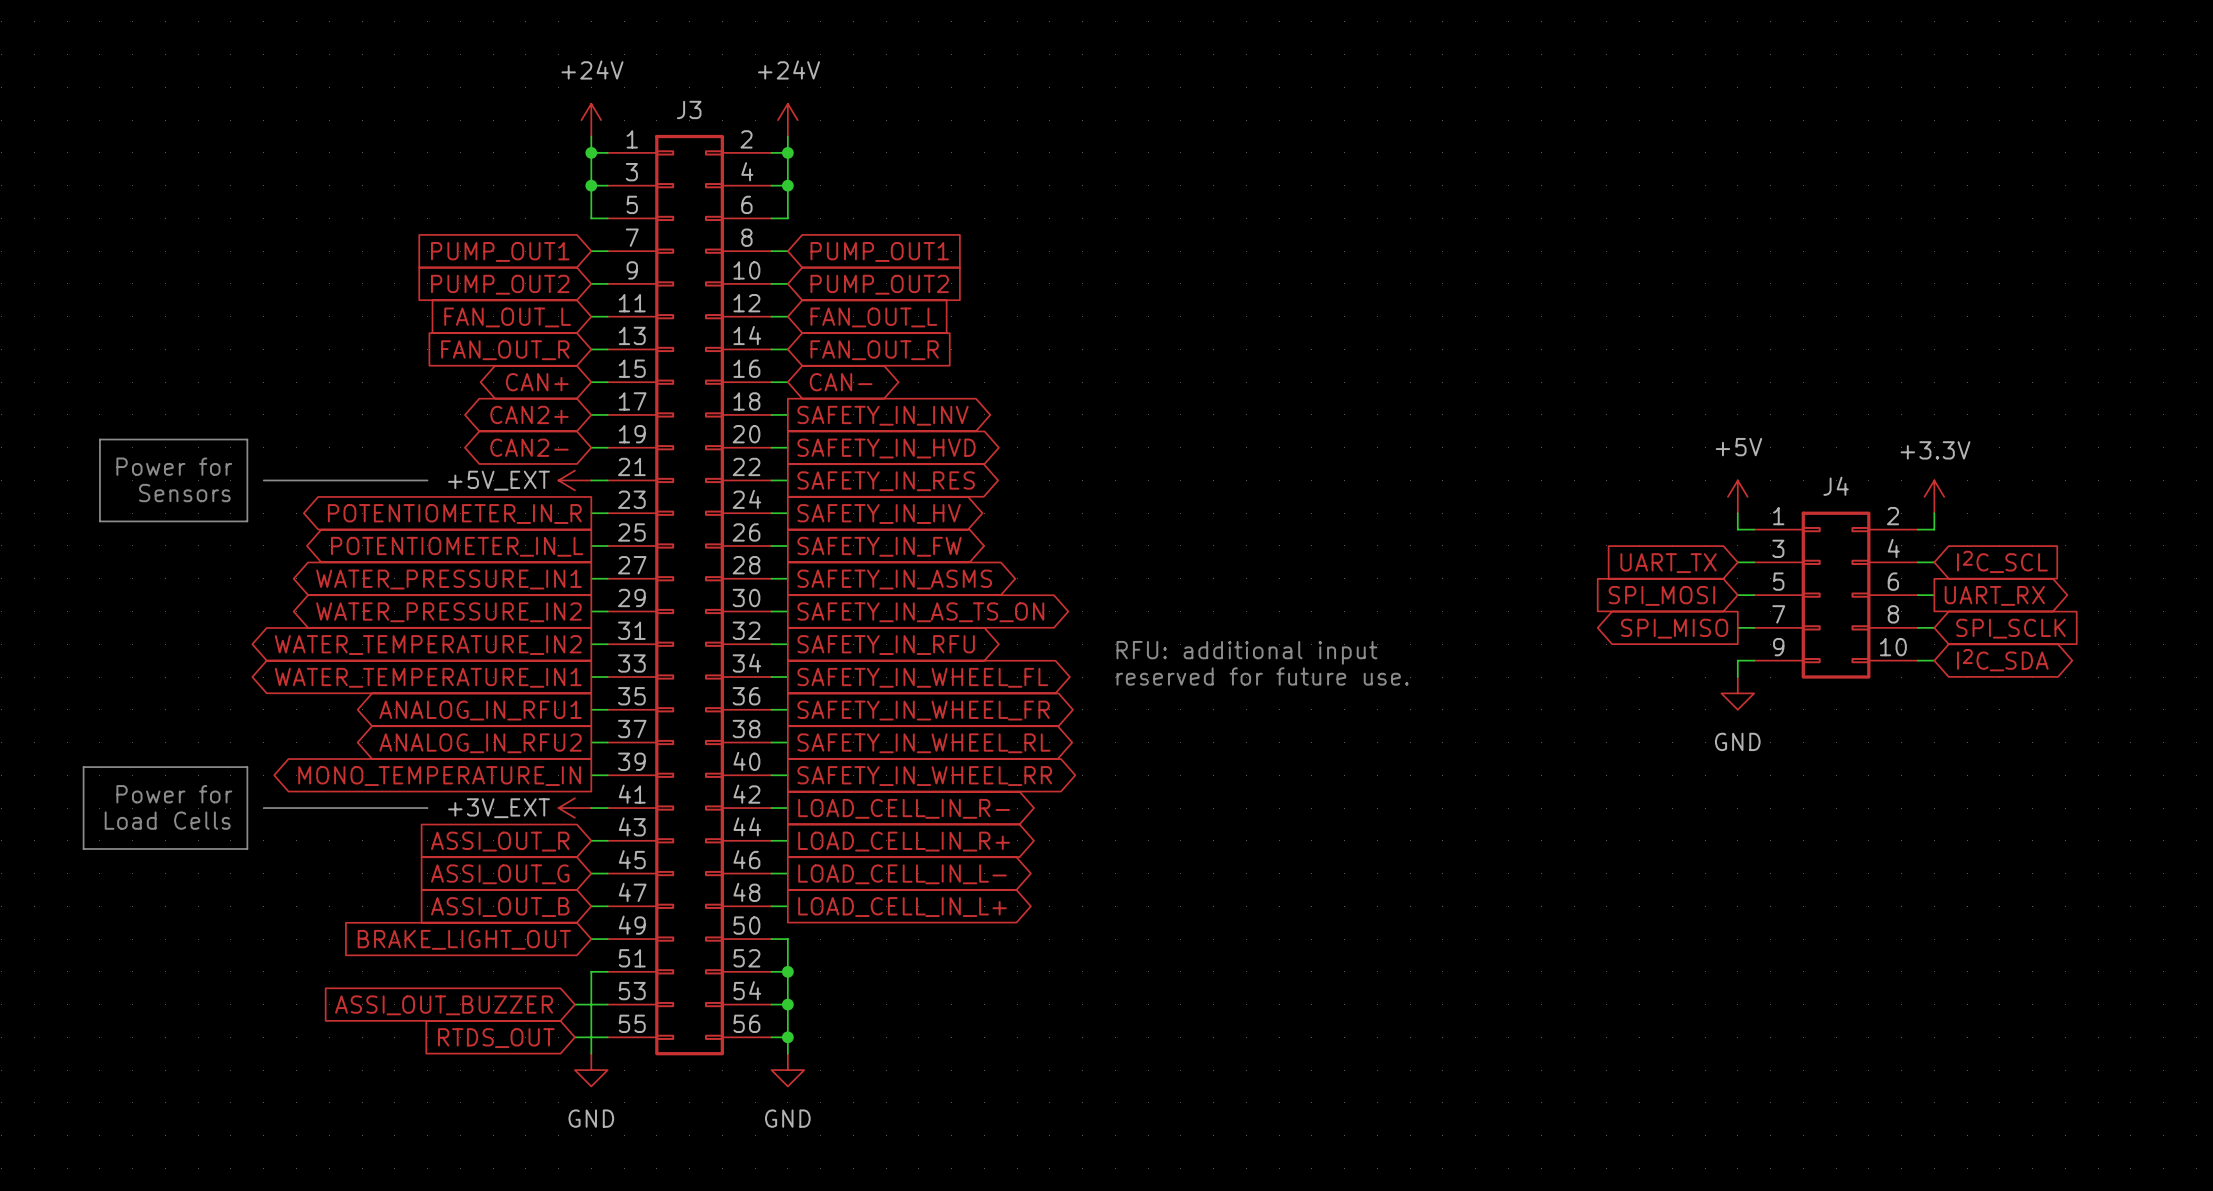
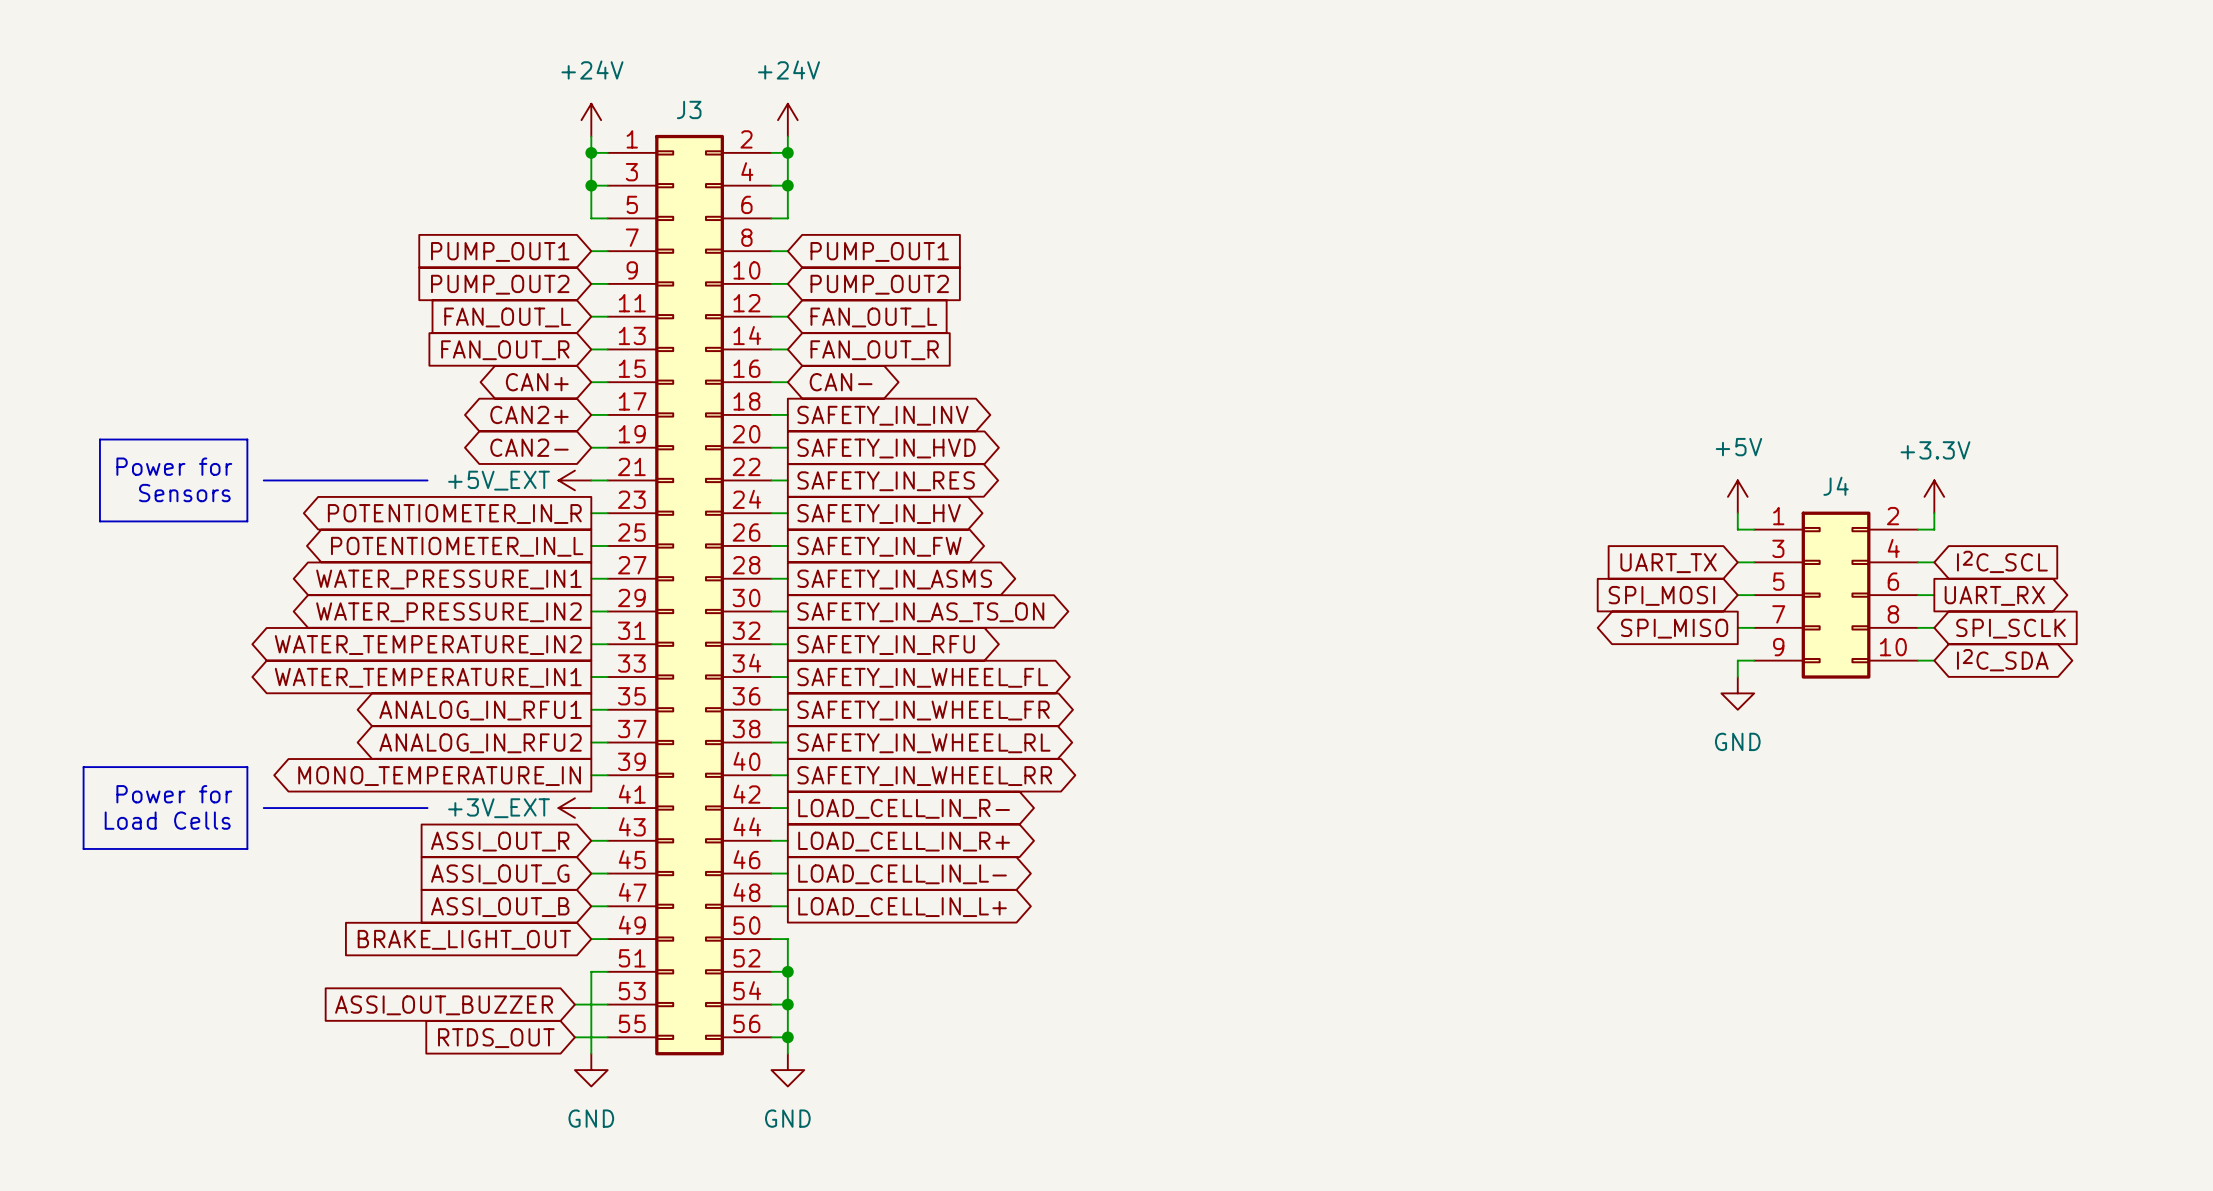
text: RFU: additional input (1246, 652) -> none
text: reserved for future use. (1262, 676) -> none

